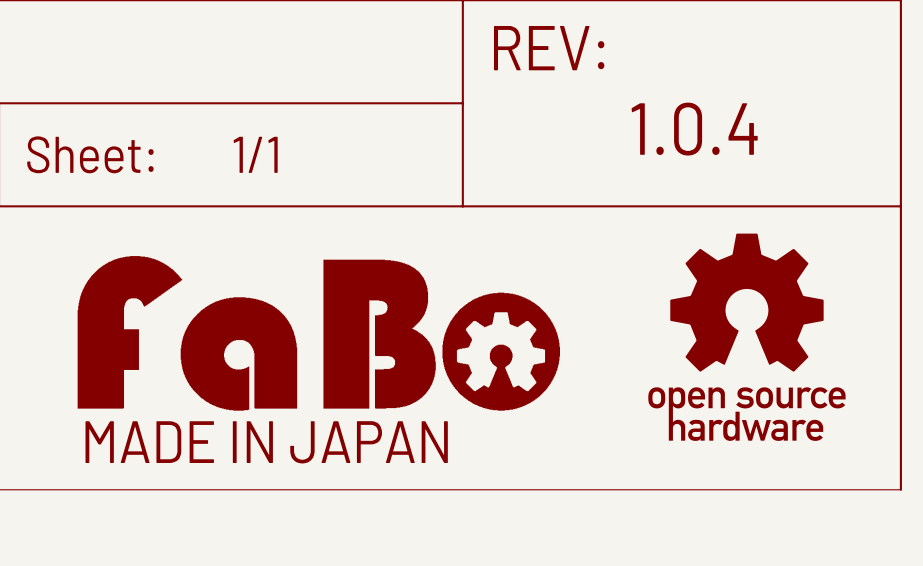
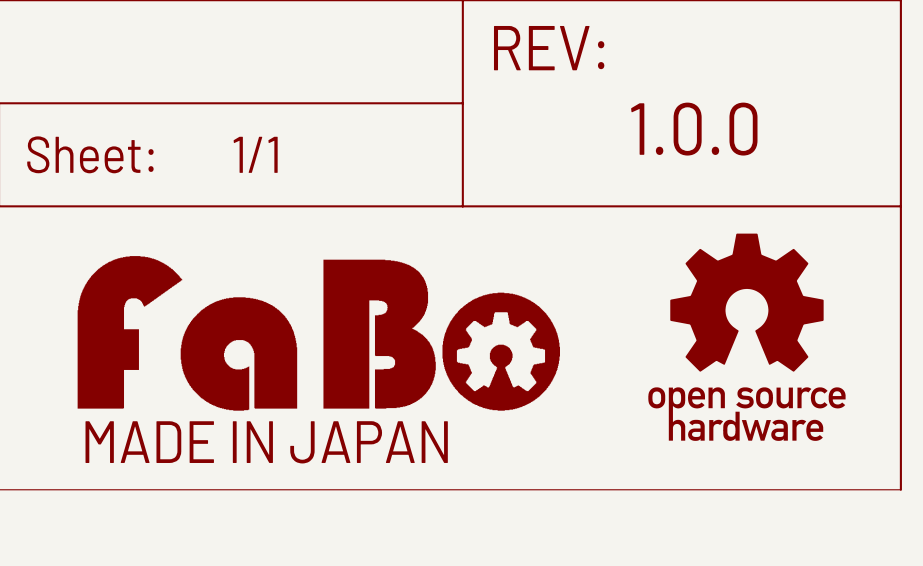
text: 1.0.4 (694, 129) -> 1.0.0 (694, 129)

